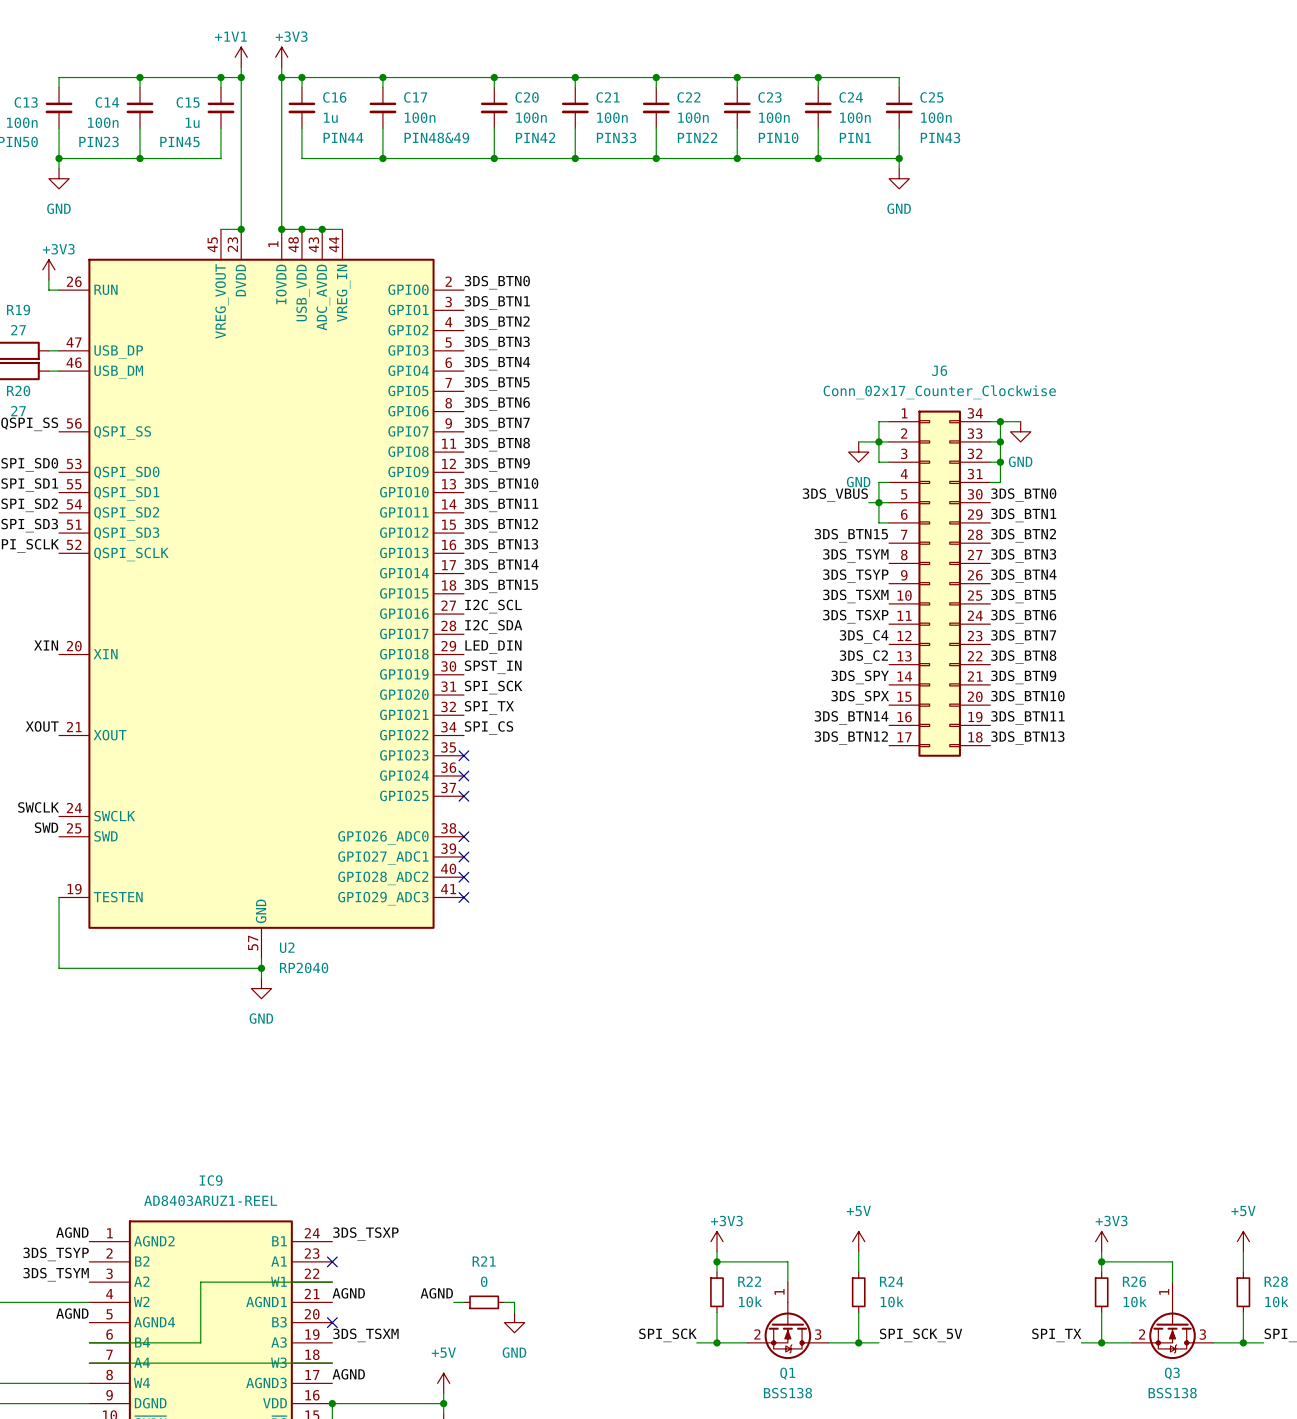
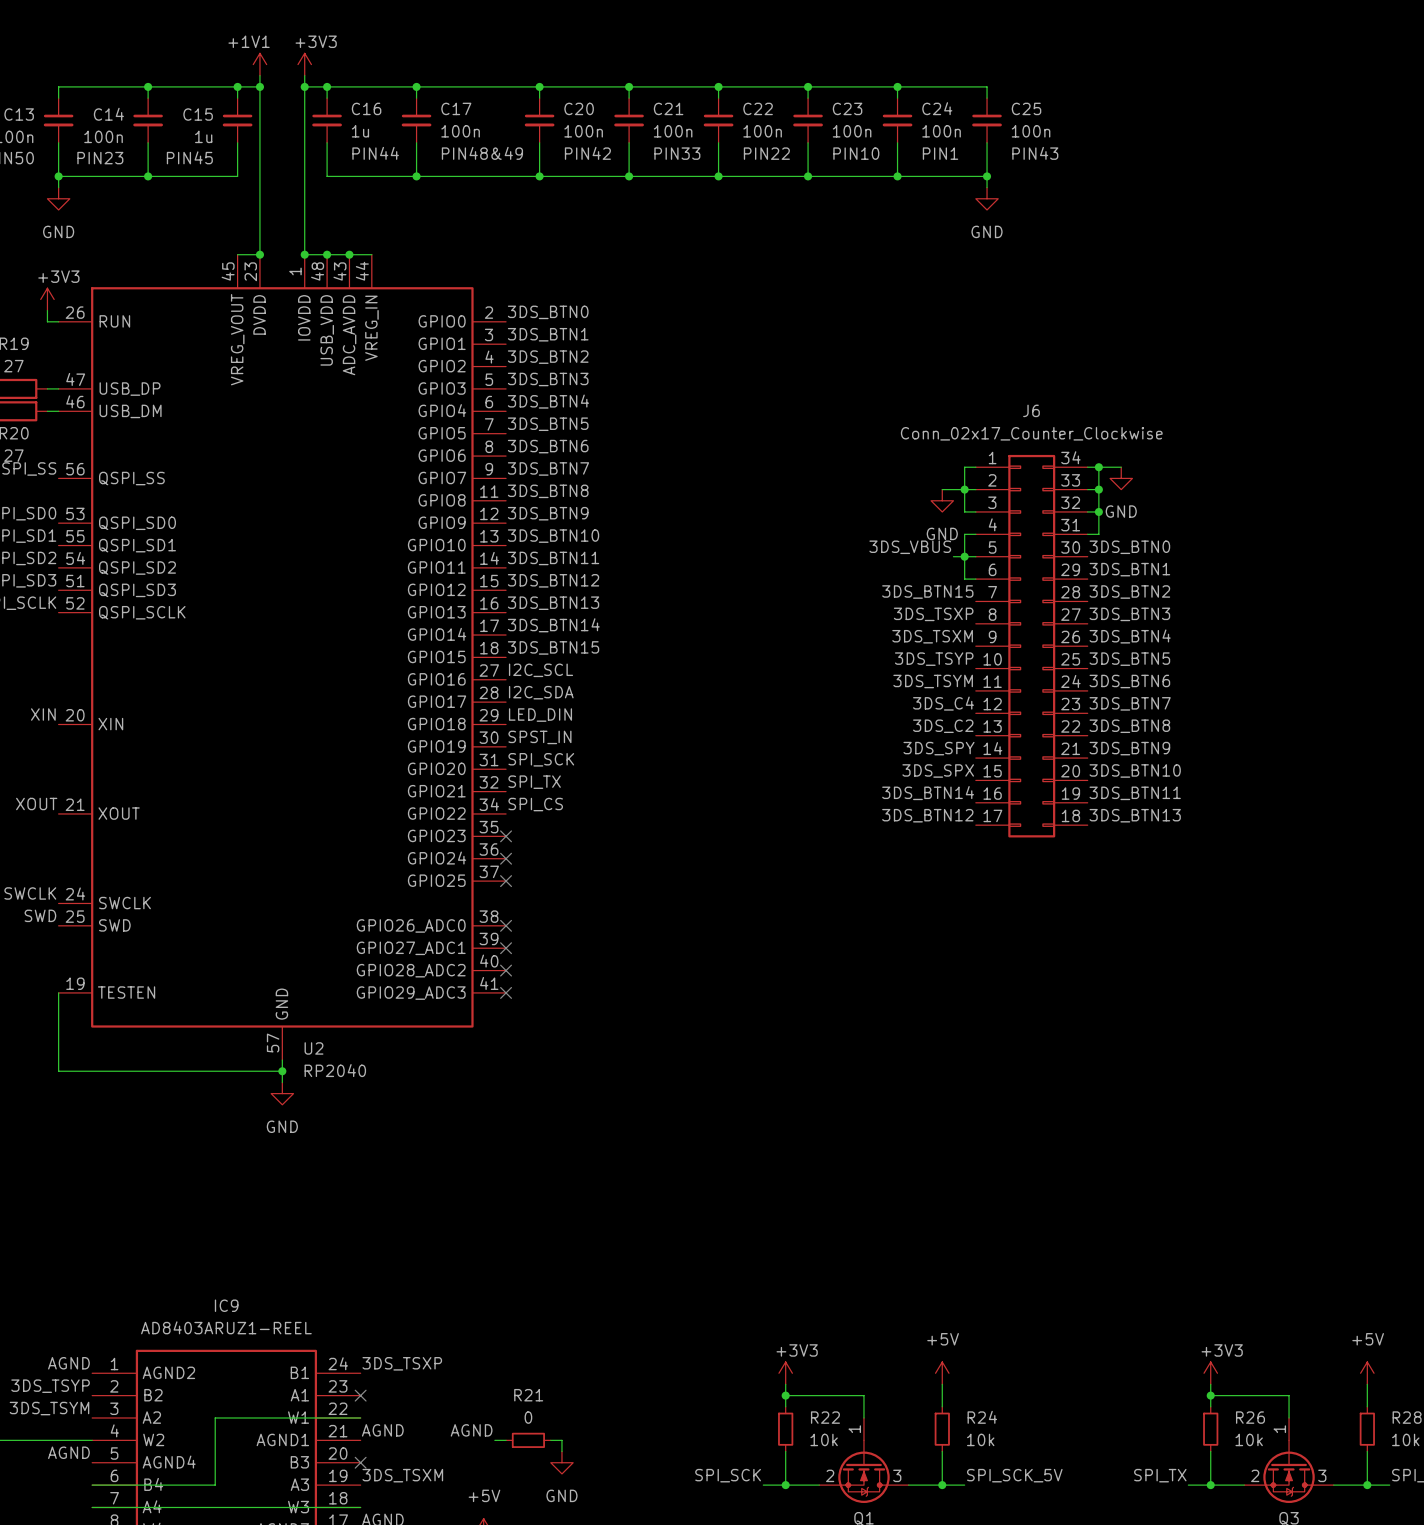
label: 3DS_TSYM (855, 555) -> 3DS_TSXP (933, 614)
label: 3DS_TSYP (855, 576) -> 3DS_TSXM (932, 636)
label: 3DS_TSXM (855, 596) -> 3DS_TSYP (934, 659)
label: 3DS_TSXP (855, 616) -> 3DS_TSYM (933, 681)

